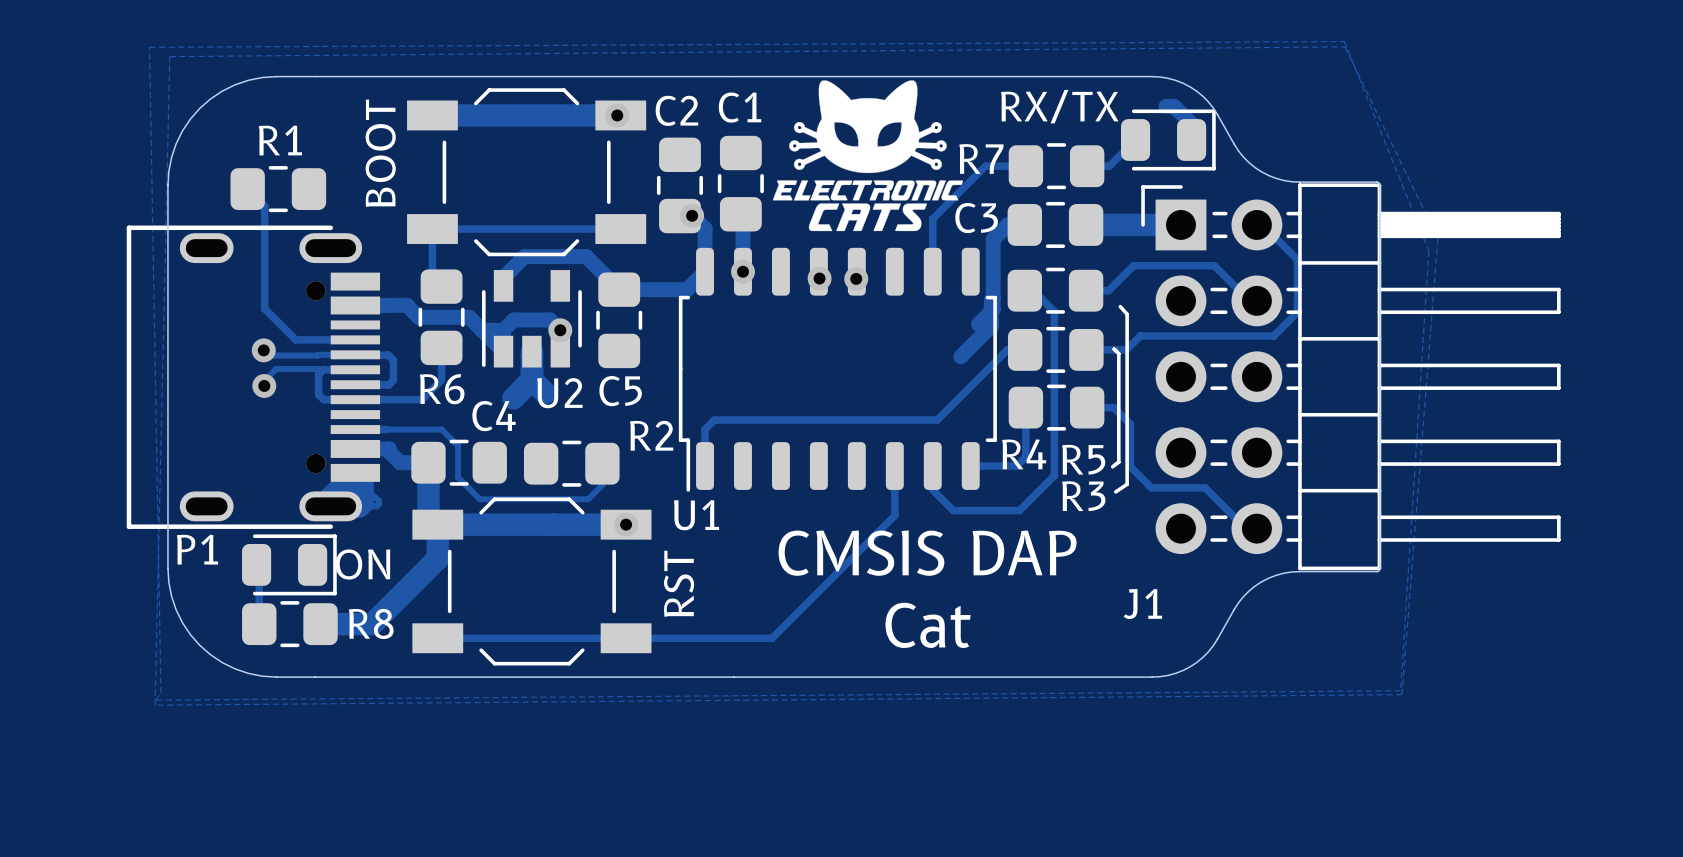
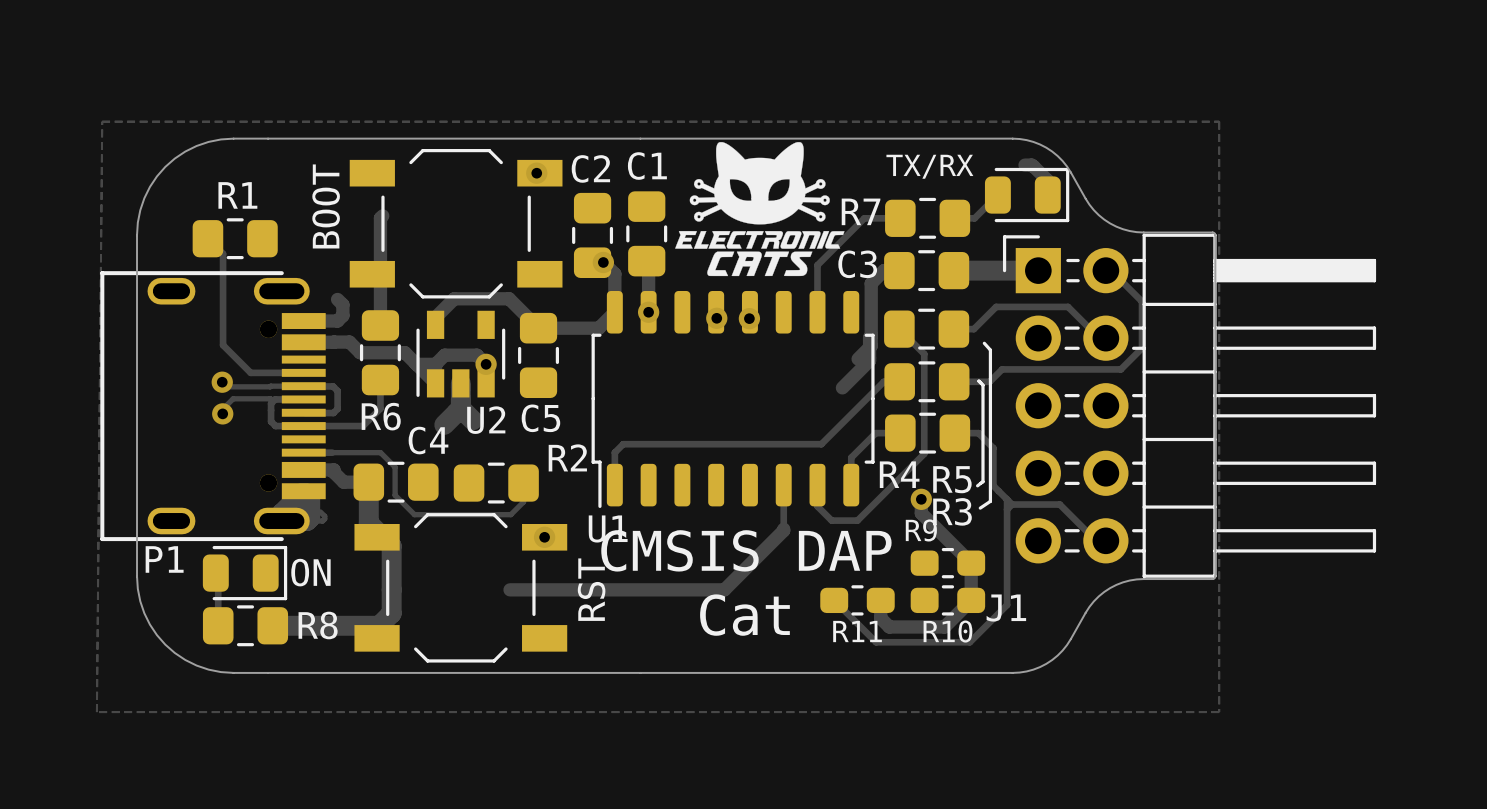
zone outline: (1344, 41) (149, 47) (160, 693) (155, 700) (1400, 690) (1428, 250) (1344, 41) -> (102, 121) (96, 712) (1219, 712) (1219, 121) (102, 121)
zone outline: (1345, 46) (169, 56) (155, 705) (1402, 694) (1437, 238) (1345, 46) -> none
RX/TX name: RX/TX (1059, 106) -> TX/RX (929, 166)
track: (432, 115) (620, 115) -> none
track: (620, 229) (432, 229) (432, 277) (441, 286) -> (382, 215) (380, 218) (380, 325)
track: none -> (337, 299) (342, 304) (342, 315) (337, 321) (303, 321)
track: (1033, 290) (1054, 311) (1054, 475) (1019, 510) (953, 510) (948, 505) -> (899, 329) (924, 354) (924, 453) (857, 520) (831, 520)
track: (1025, 407) (1025, 456) (1016, 466) (970, 466) -> (900, 433) (875, 433) (851, 457) (851, 485)
track: none -> (921, 499) (921, 513) (971, 563) (971, 600) (944, 626) (889, 626) (880, 618) (880, 600)
via: none -> (921, 499)
track: none -> (1007, 499) (1007, 605) (969, 642) (876, 642) (834, 600)
track: (894, 515) (772, 638) (437, 638) -> (783, 529) (724, 589) (510, 589)
track: (437, 524) (437, 558) (372, 624) -> (368, 523) (391, 546) (391, 613) (379, 625) (318, 625)
track: (437, 524) (626, 524) (437, 524) -> none
text position: CMSIS DAP (927, 553) -> CMSIS DAP (746, 550)
R9: none -> (947, 563)
R11: none -> (857, 600)
R10: none -> (947, 600)
text position: Cat (928, 625) -> Cat (744, 615)

